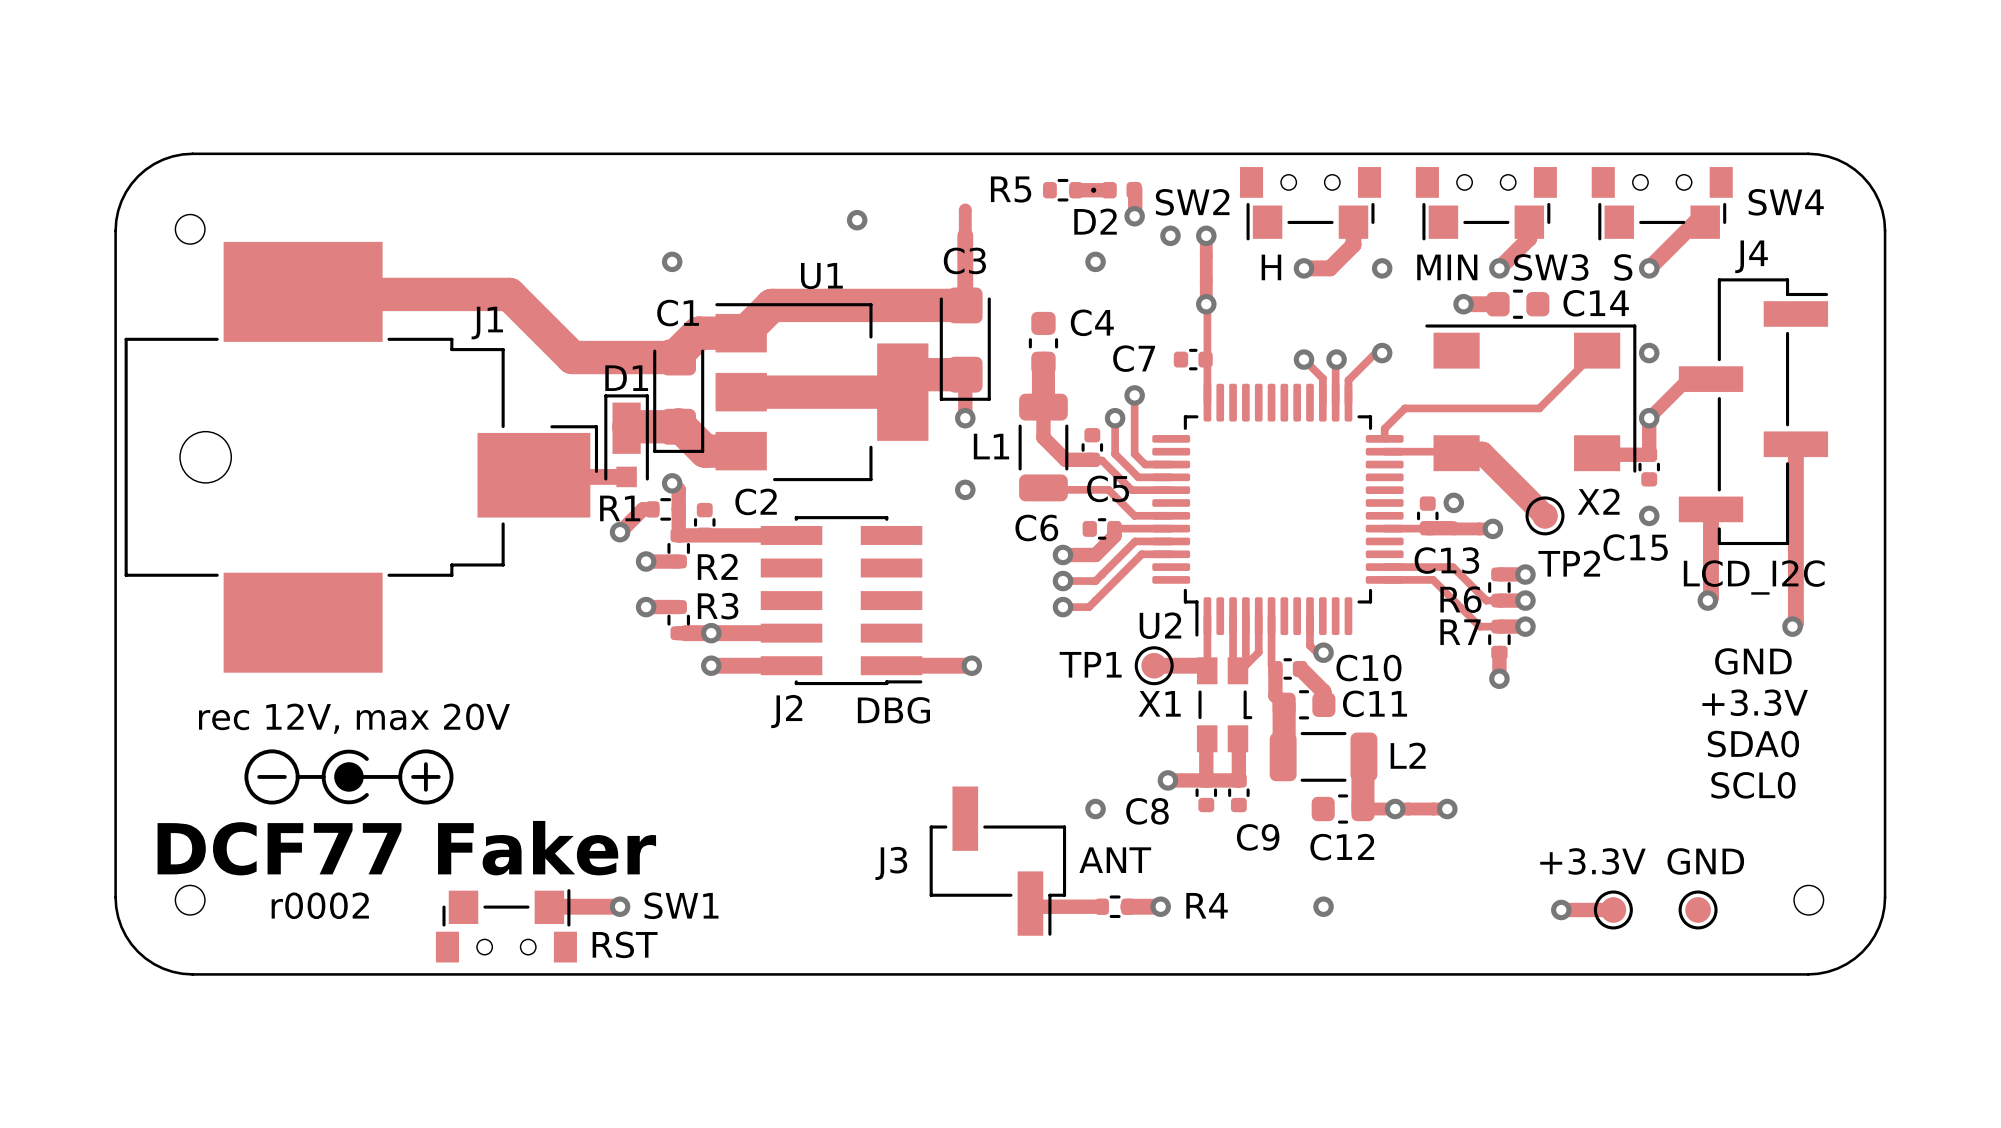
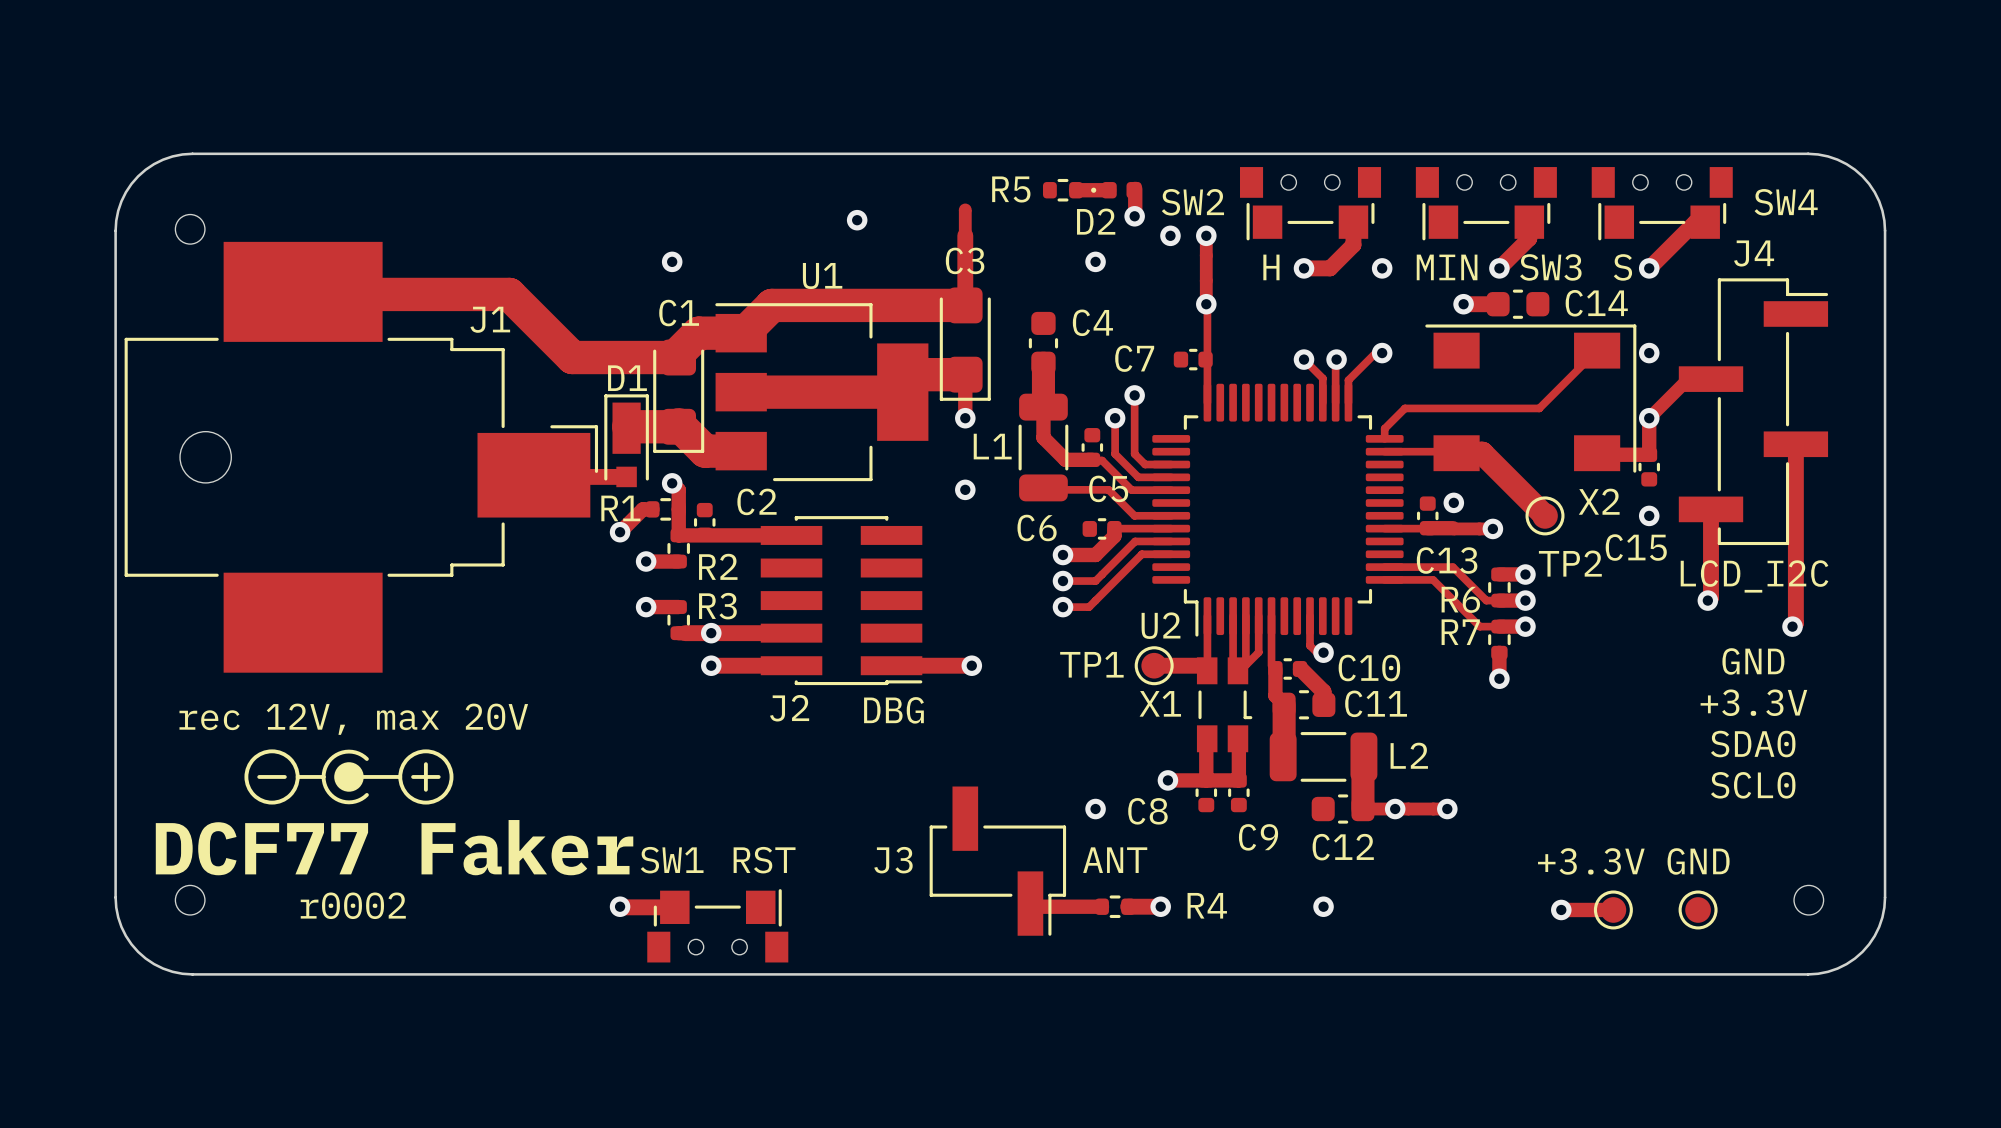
text position: r0002 (320, 905) -> r0002 (353, 905)
SW1 name position: SW1 (681, 905) -> SW1 (672, 860)
top track: (550, 906) (620, 906) -> (674, 907) (620, 907)
SW1 position: (506, 925) -> (717, 925)
SW1 value position: RST (625, 944) -> RST (764, 860)

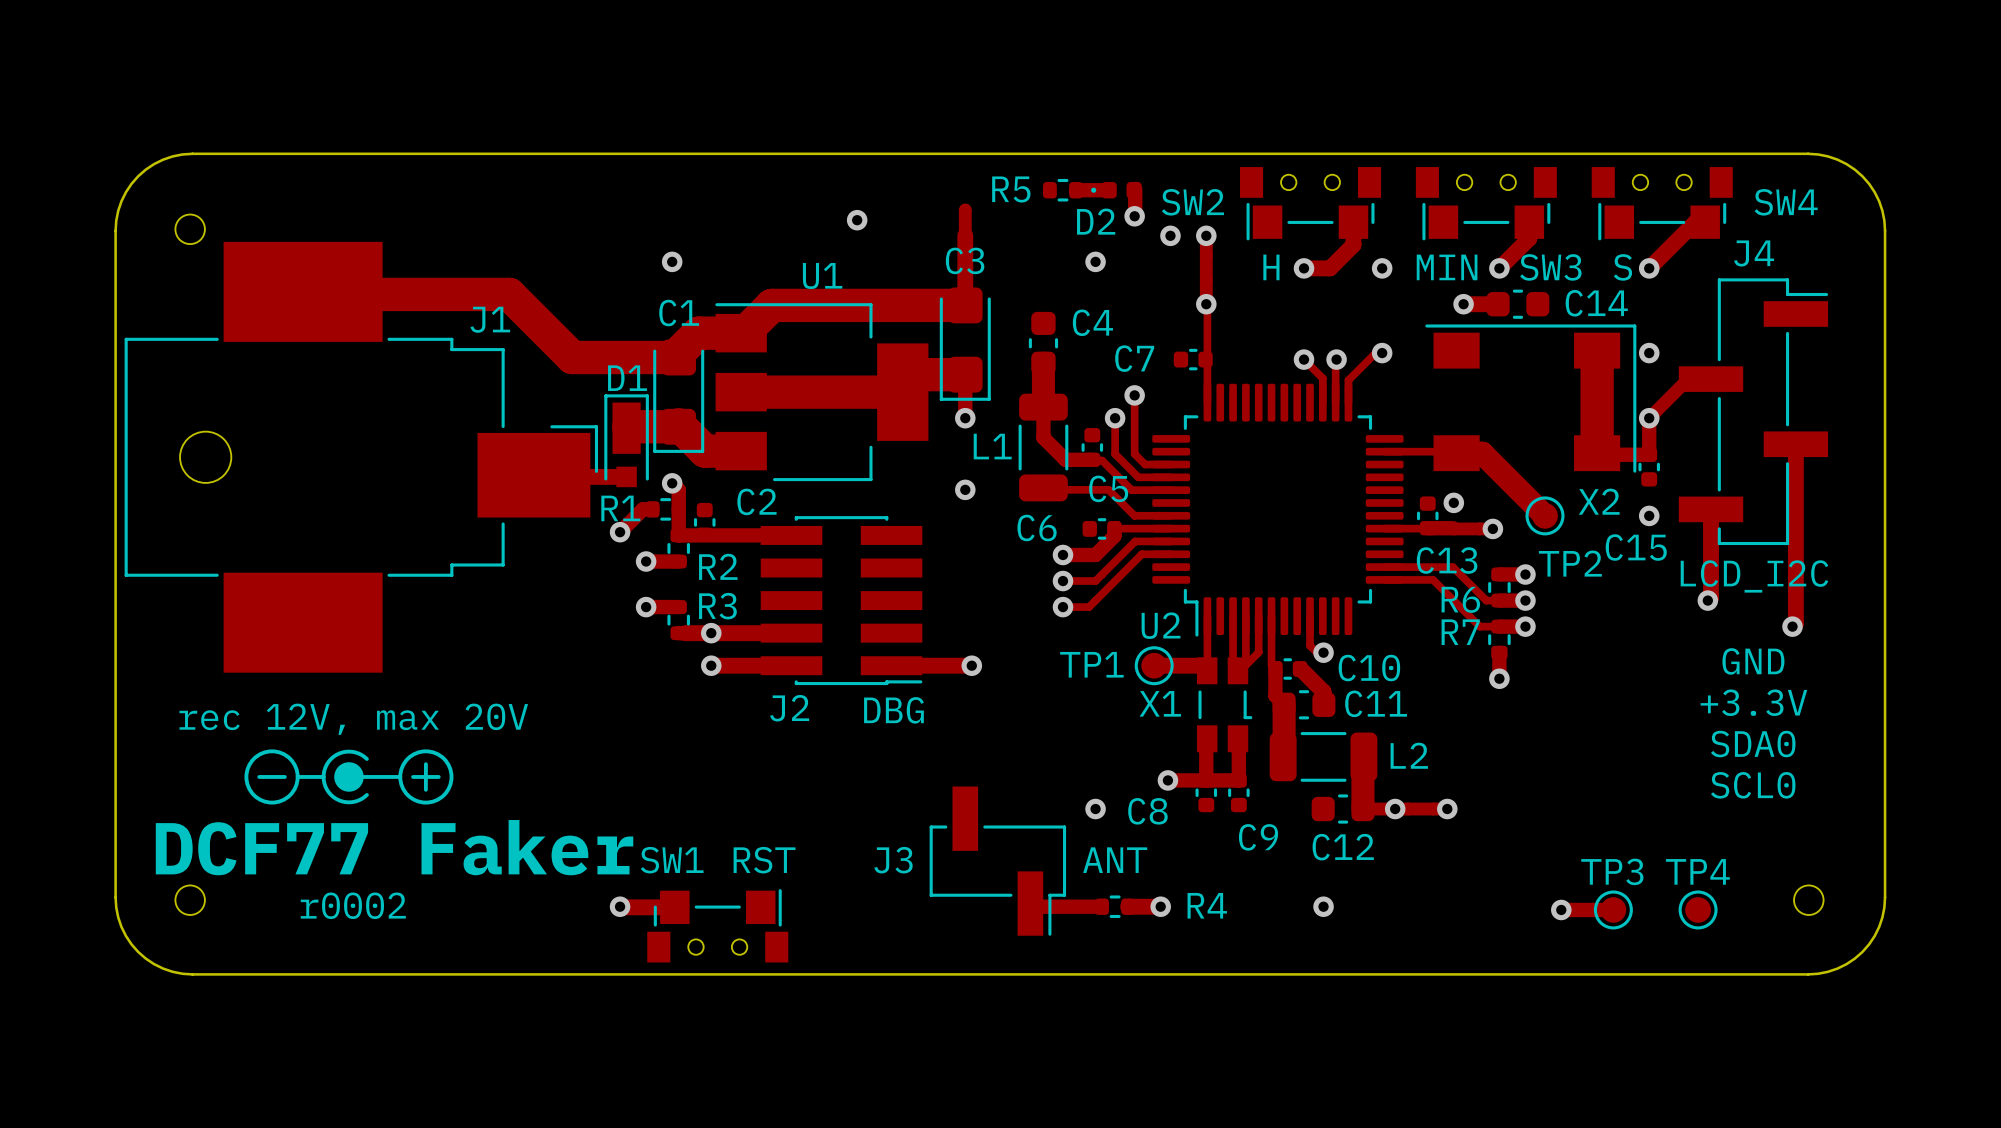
top track: (1597, 350) (1539, 408) (1404, 408) (1384, 428) (1384, 438) -> (1597, 350) (1597, 450)
text: +3.3V (1591, 861) -> none
text: GND (1698, 861) -> none
TP3 name: none -> TP3 (1612, 871)
TP4 name: none -> TP4 (1697, 871)

